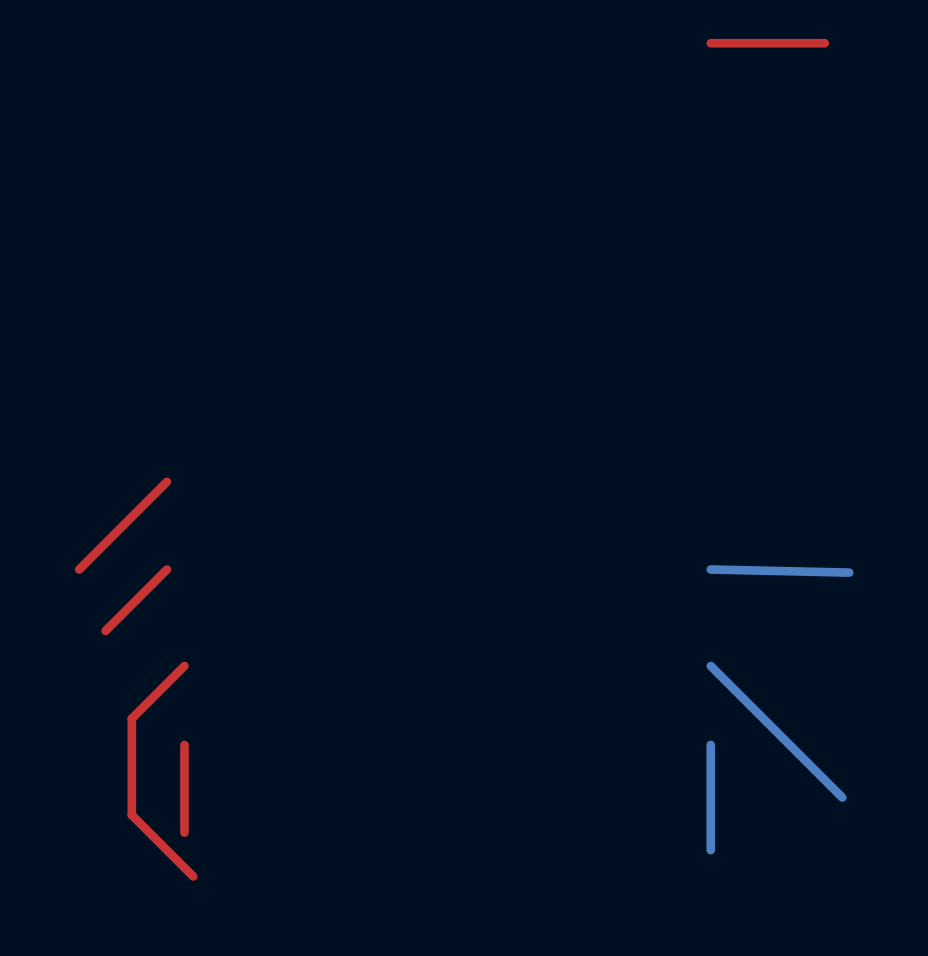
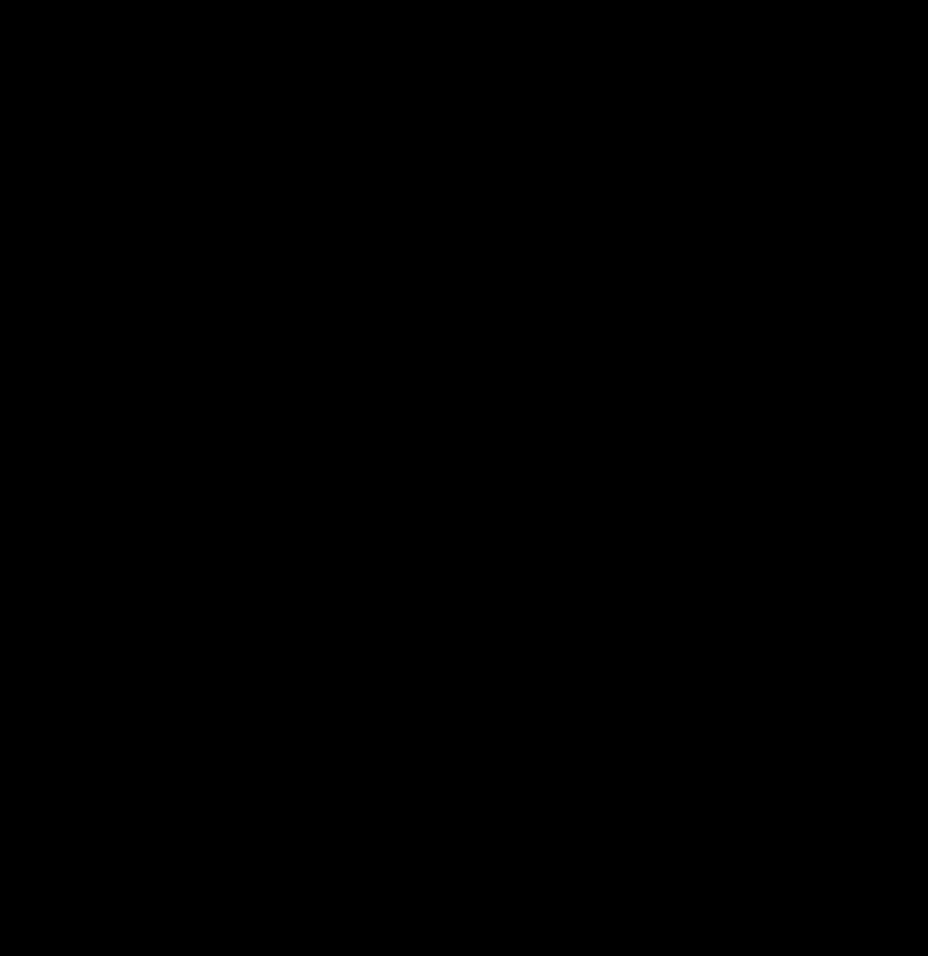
top track: (710, 43) (824, 43) -> none
top track: (166, 481) (79, 569) -> none
top track: (166, 569) (105, 630) -> none
bottom track: (710, 569) (849, 572) -> none
top track: (184, 665) (131, 718) (131, 815) (193, 876) -> none
bottom track: (710, 665) (842, 797) -> none
top track: (184, 744) (184, 832) -> none
bottom track: (710, 744) (710, 850) -> none

